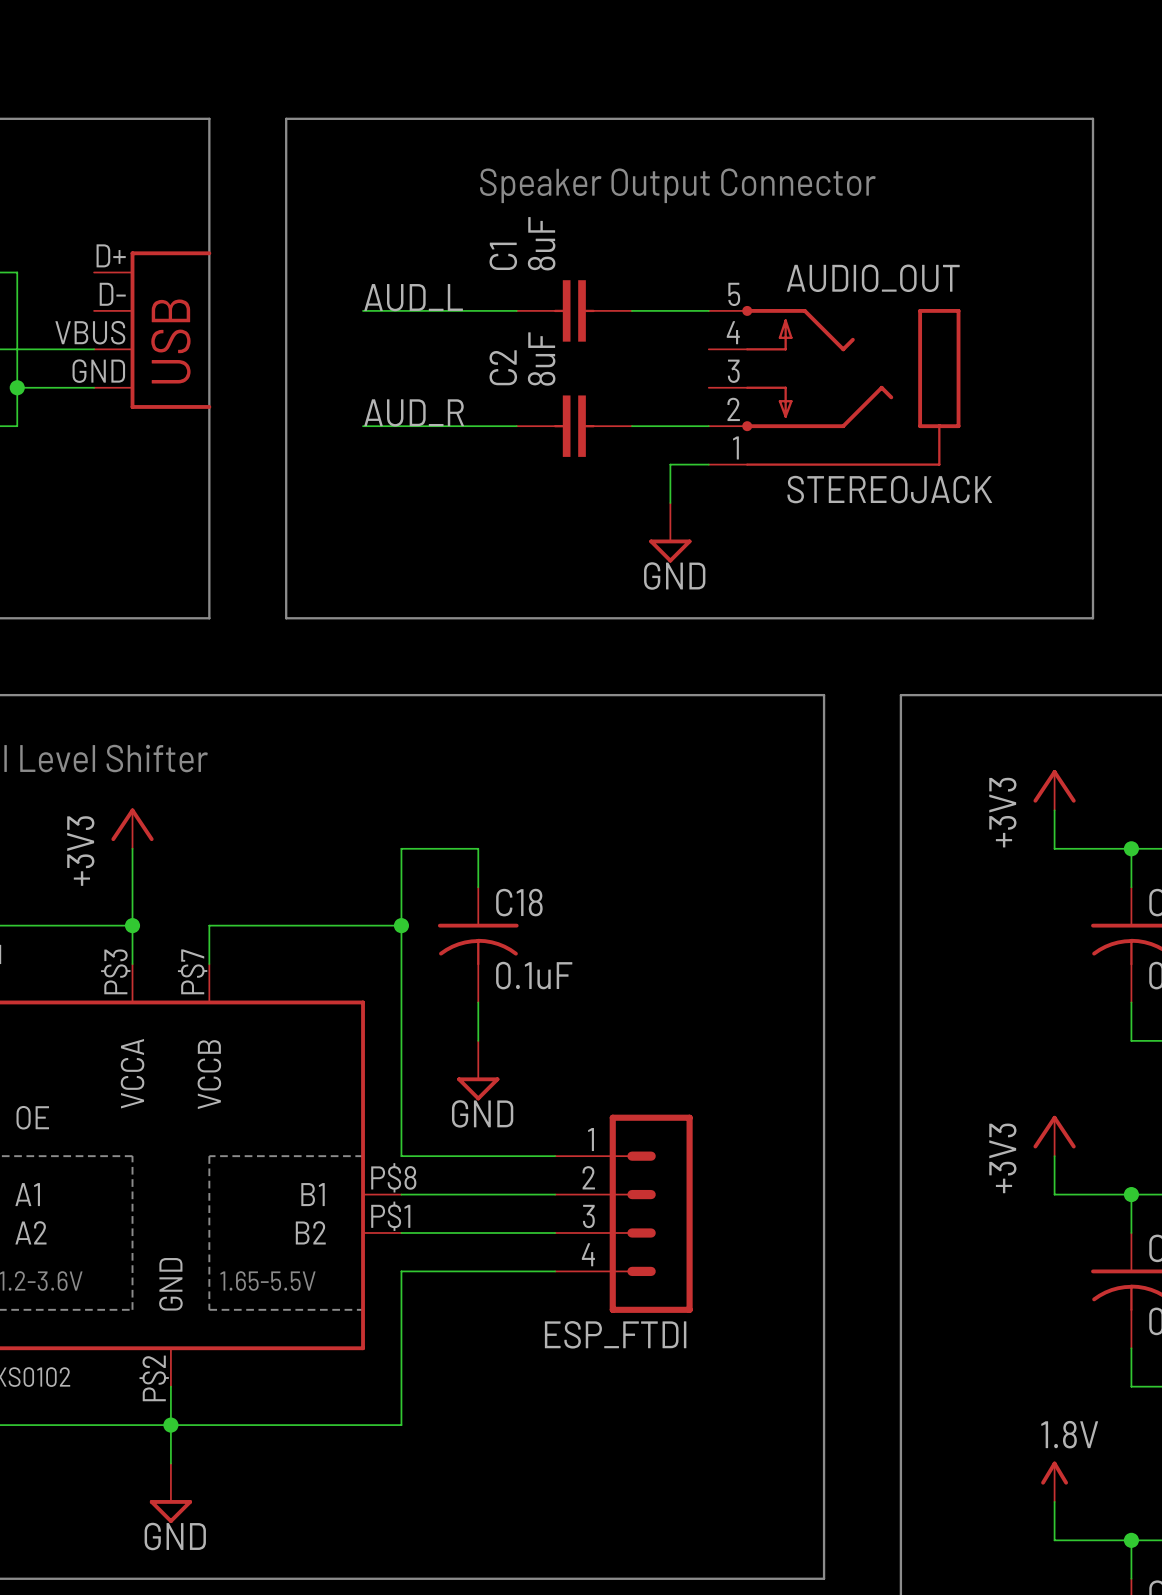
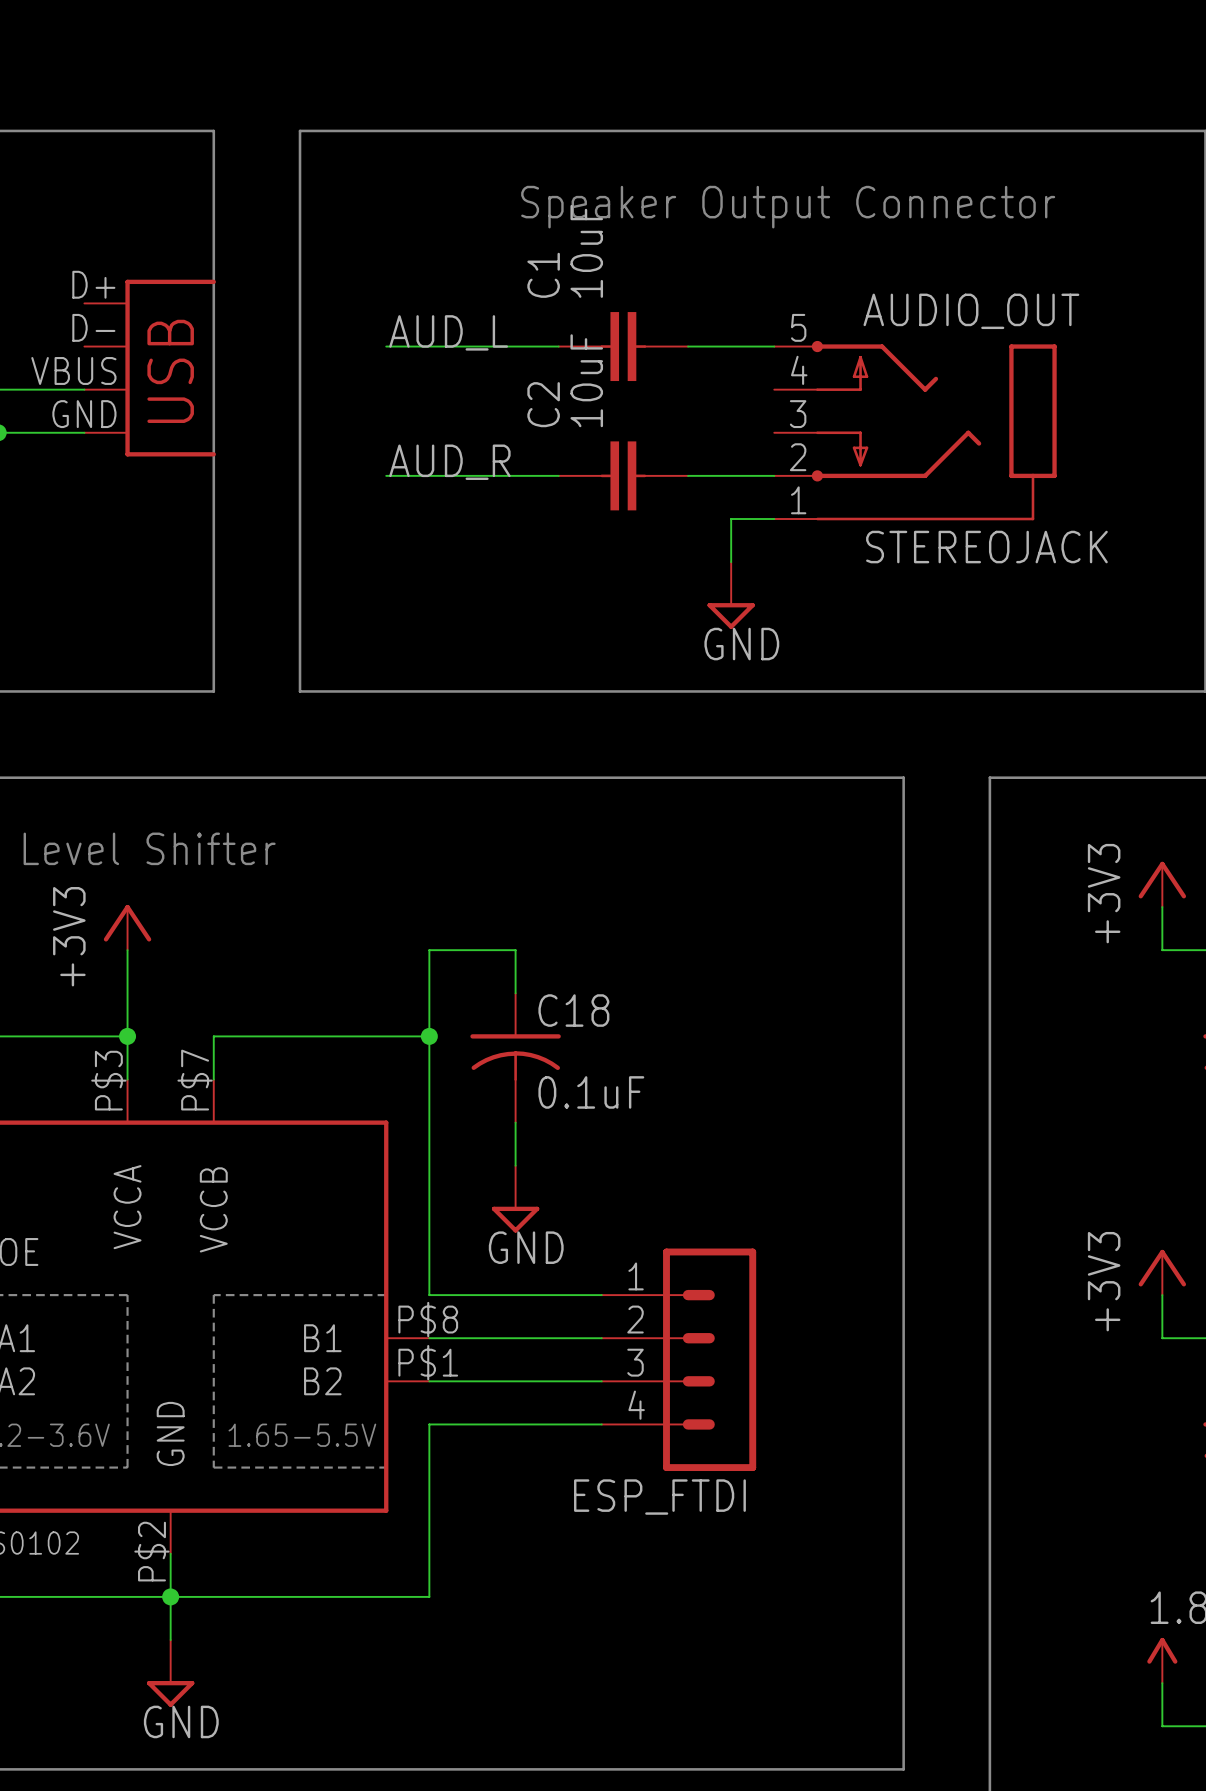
C1 value: 8uF (541, 243) -> 10uF (586, 251)
C2 value: 8uF (541, 359) -> 10uF (586, 380)

